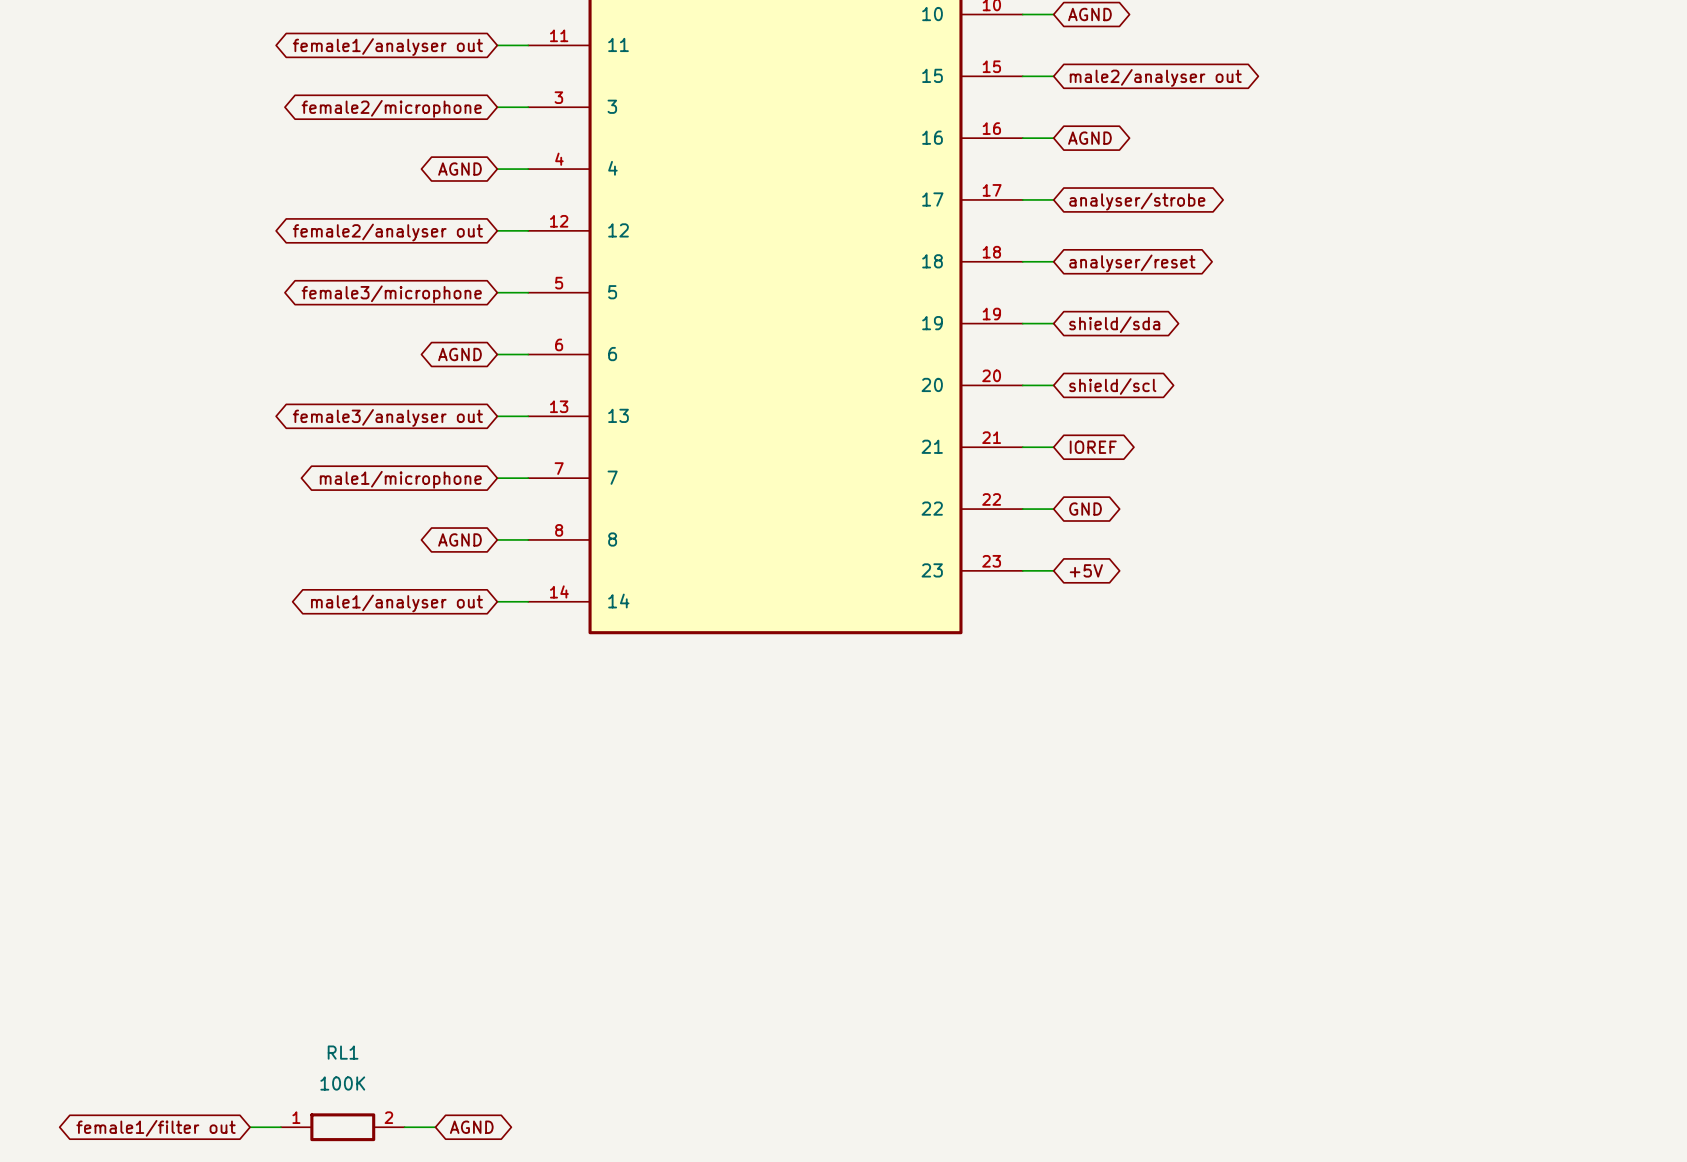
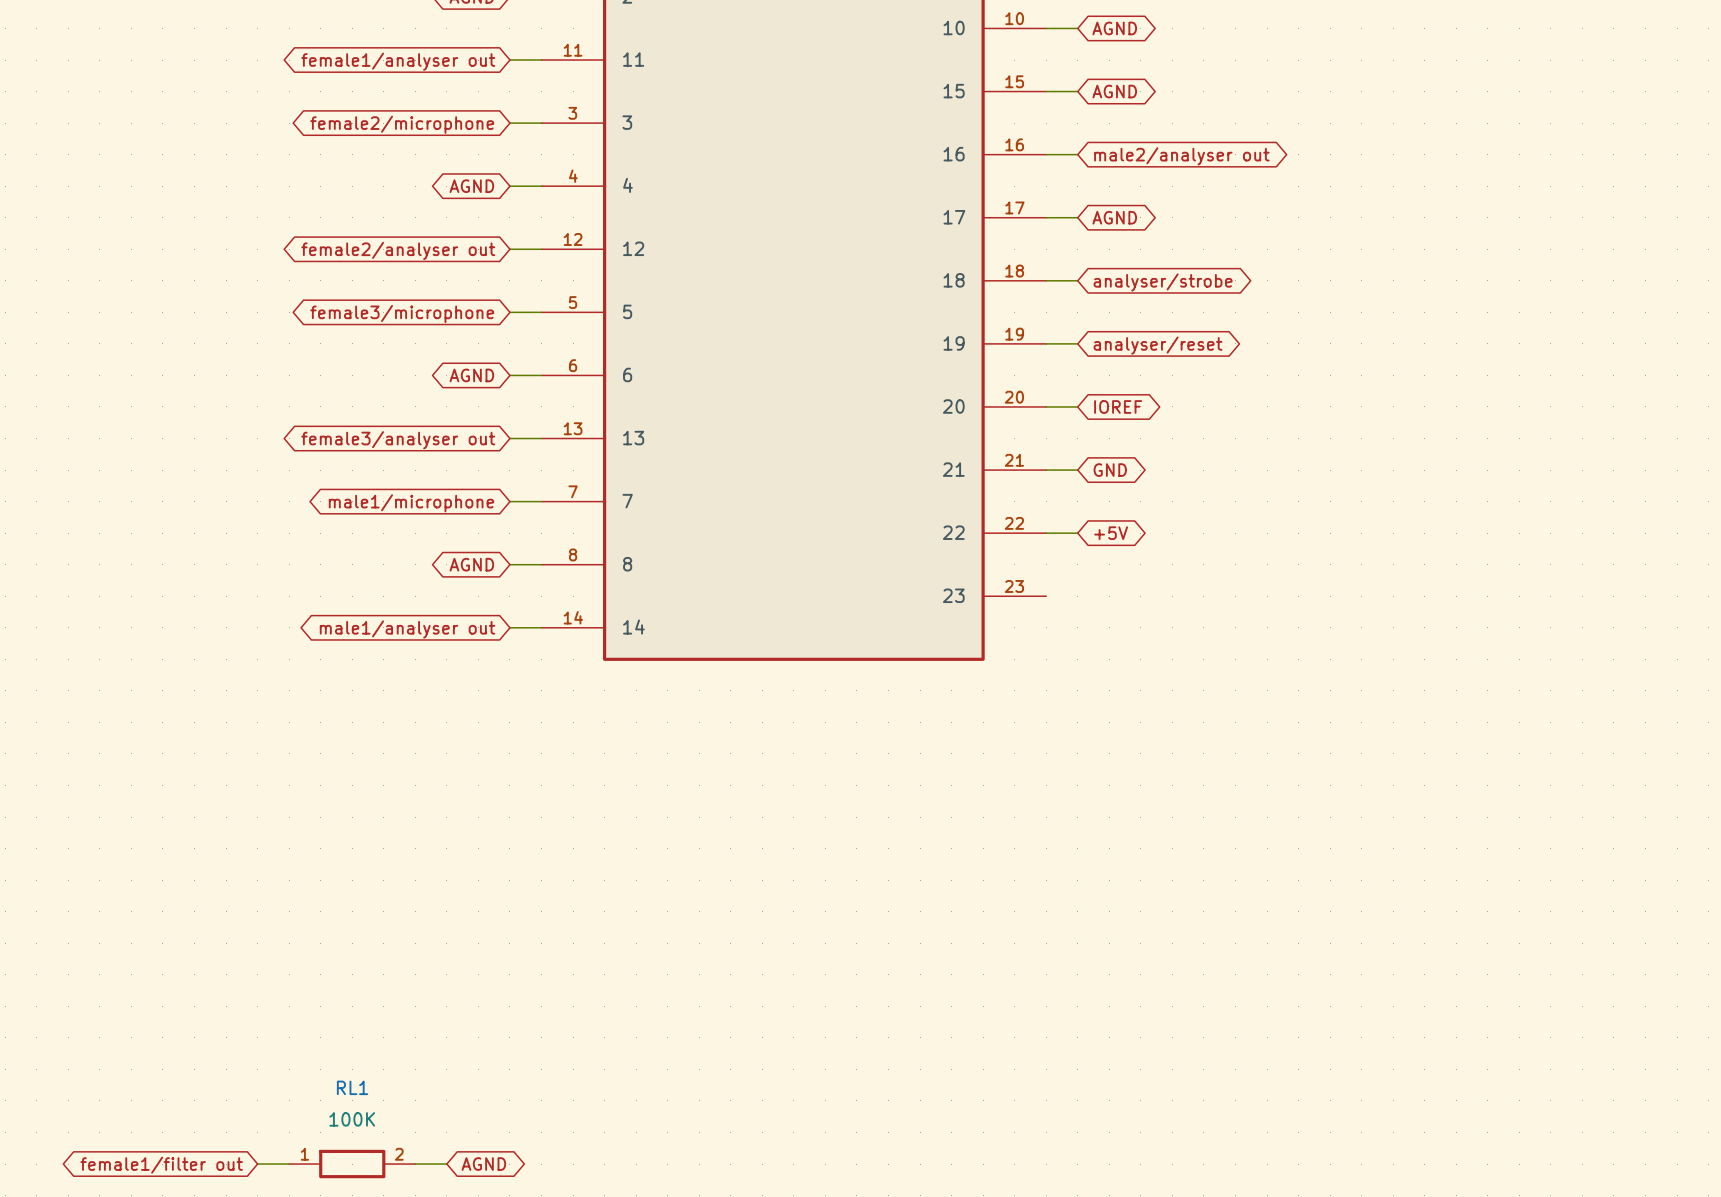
global label: male2/analyser out (1155, 77) -> AGND (1114, 91)
global label: AGND (1089, 138) -> male2/analyser out (1181, 156)
global label: analyser/strobe (1137, 201) -> AGND (1114, 217)
global label: analyser/reset (1132, 263) -> analyser/strobe (1163, 282)
global label: shield/sda (1114, 324) -> analyser/reset (1158, 345)
global label: shield/scl (1112, 386) -> IOREF (1118, 406)
global label: IOREF (1093, 447) -> GND (1110, 470)
global label: GND (1085, 509) -> +5V (1111, 533)
wire: (1022, 570) (1053, 570) -> none
global label: +5V (1086, 570) -> none

